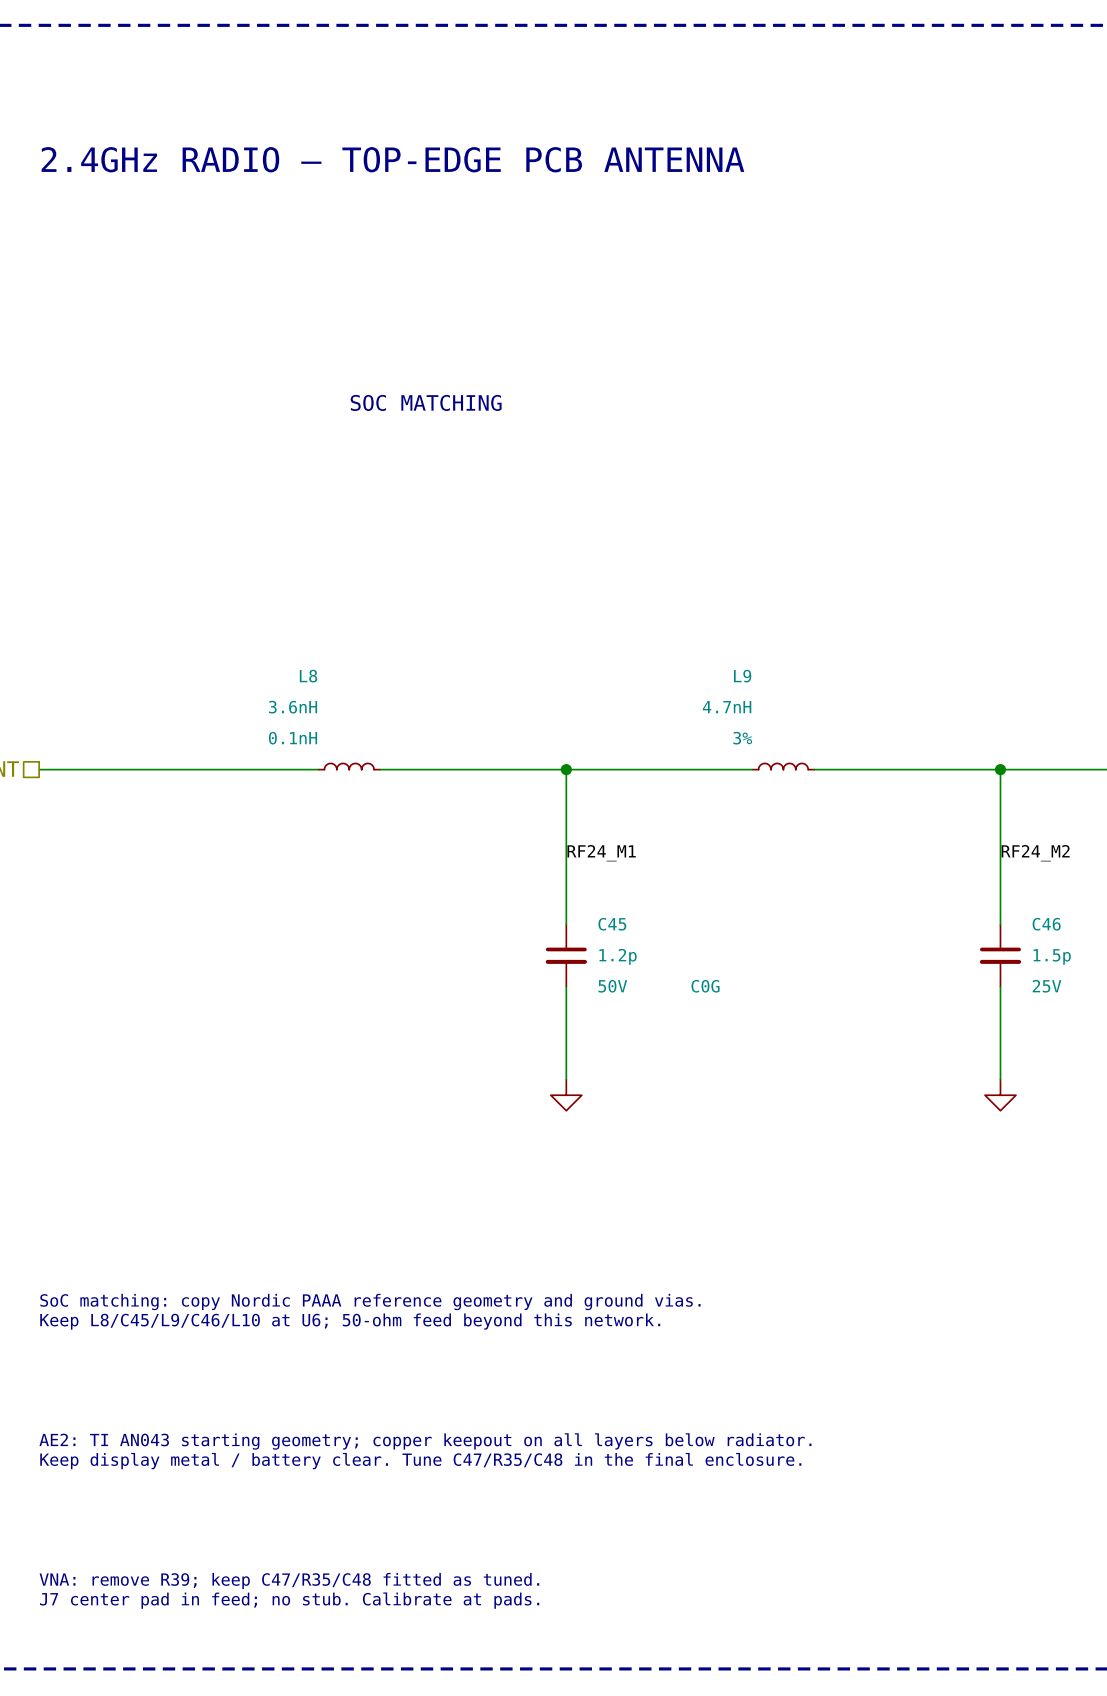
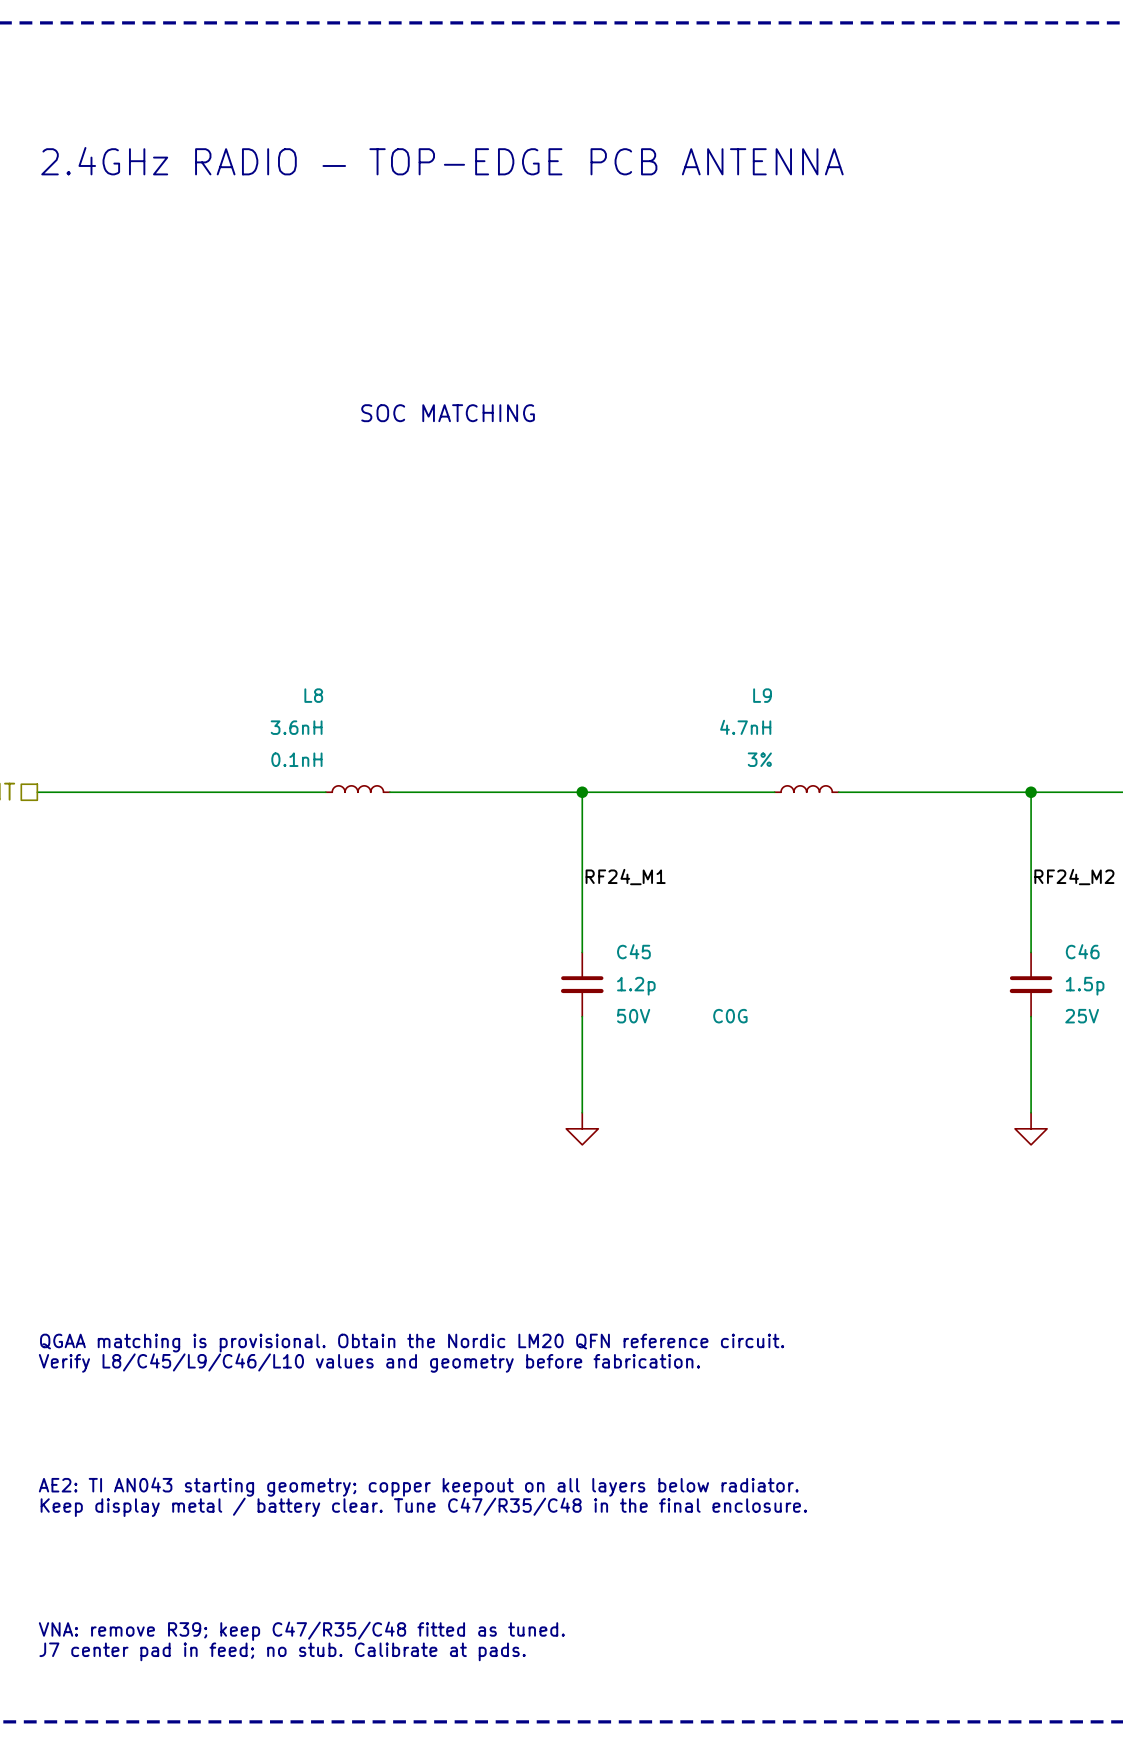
text: SoC matching: copy Nordic PAAA reference geometry and ground vias. (370, 1301) -> QGAA matching is provisional. Obtain the Nordic LM20 QFN reference circuit. (412, 1343)
text: Keep L8/C45/L9/C46/L10 at U6; 50-ohm feed beyond this network. (350, 1321) -> Verify L8/C45/L9/C46/L10 values and geometry before fabrication. (369, 1363)

